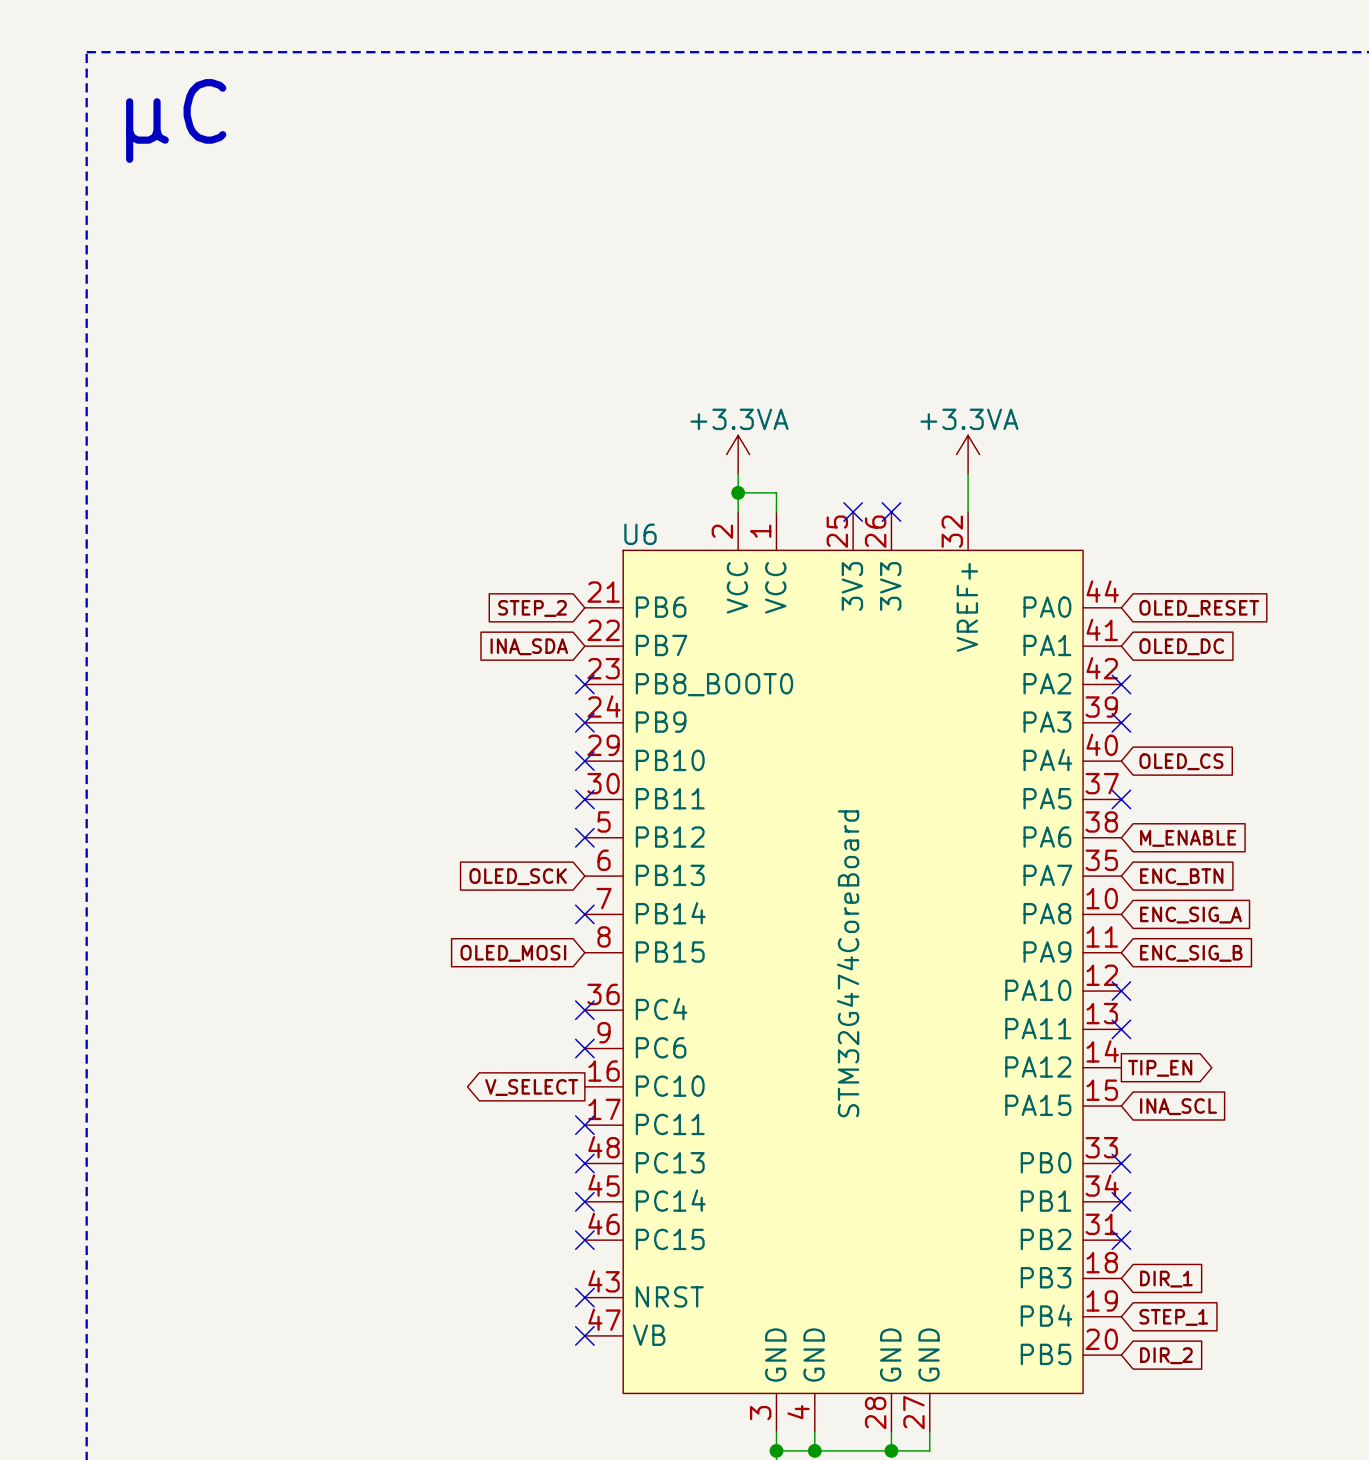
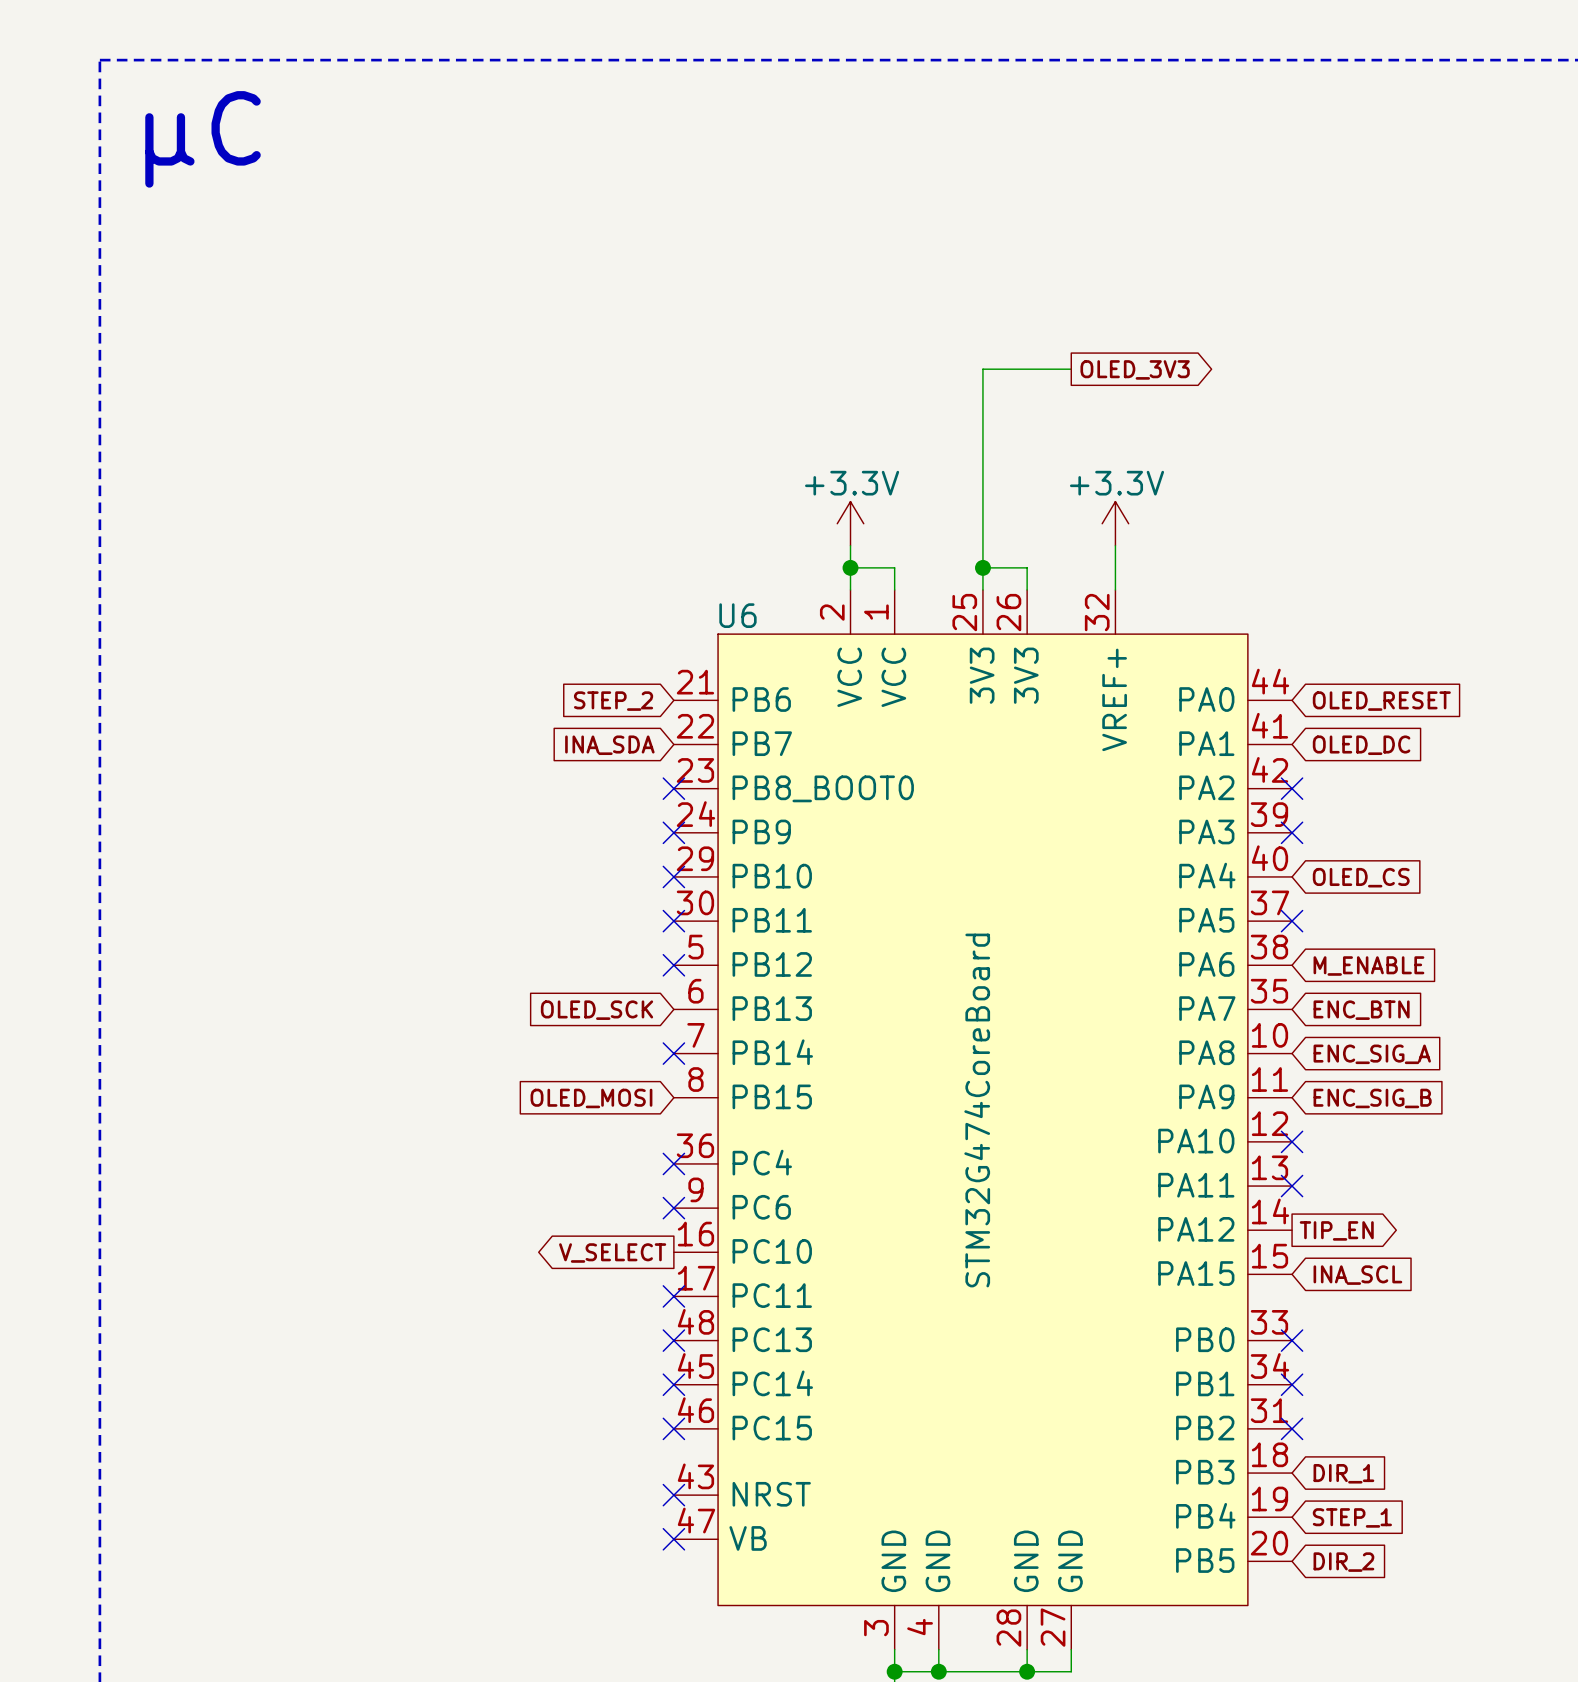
wire: none -> (1071, 369) (982, 369) (982, 589)
global label: none -> OLED_3V3 (1135, 369)
power symbol: +3.3VA (738, 454) -> +3.3V (850, 523)
power symbol: +3.3VA (968, 454) -> +3.3V (1115, 523)
wire: none -> (982, 567) (1027, 567) (1027, 589)
junction: none -> (982, 567)
no-connect mark: (853, 512) -> none
no-connect mark: (891, 512) -> none

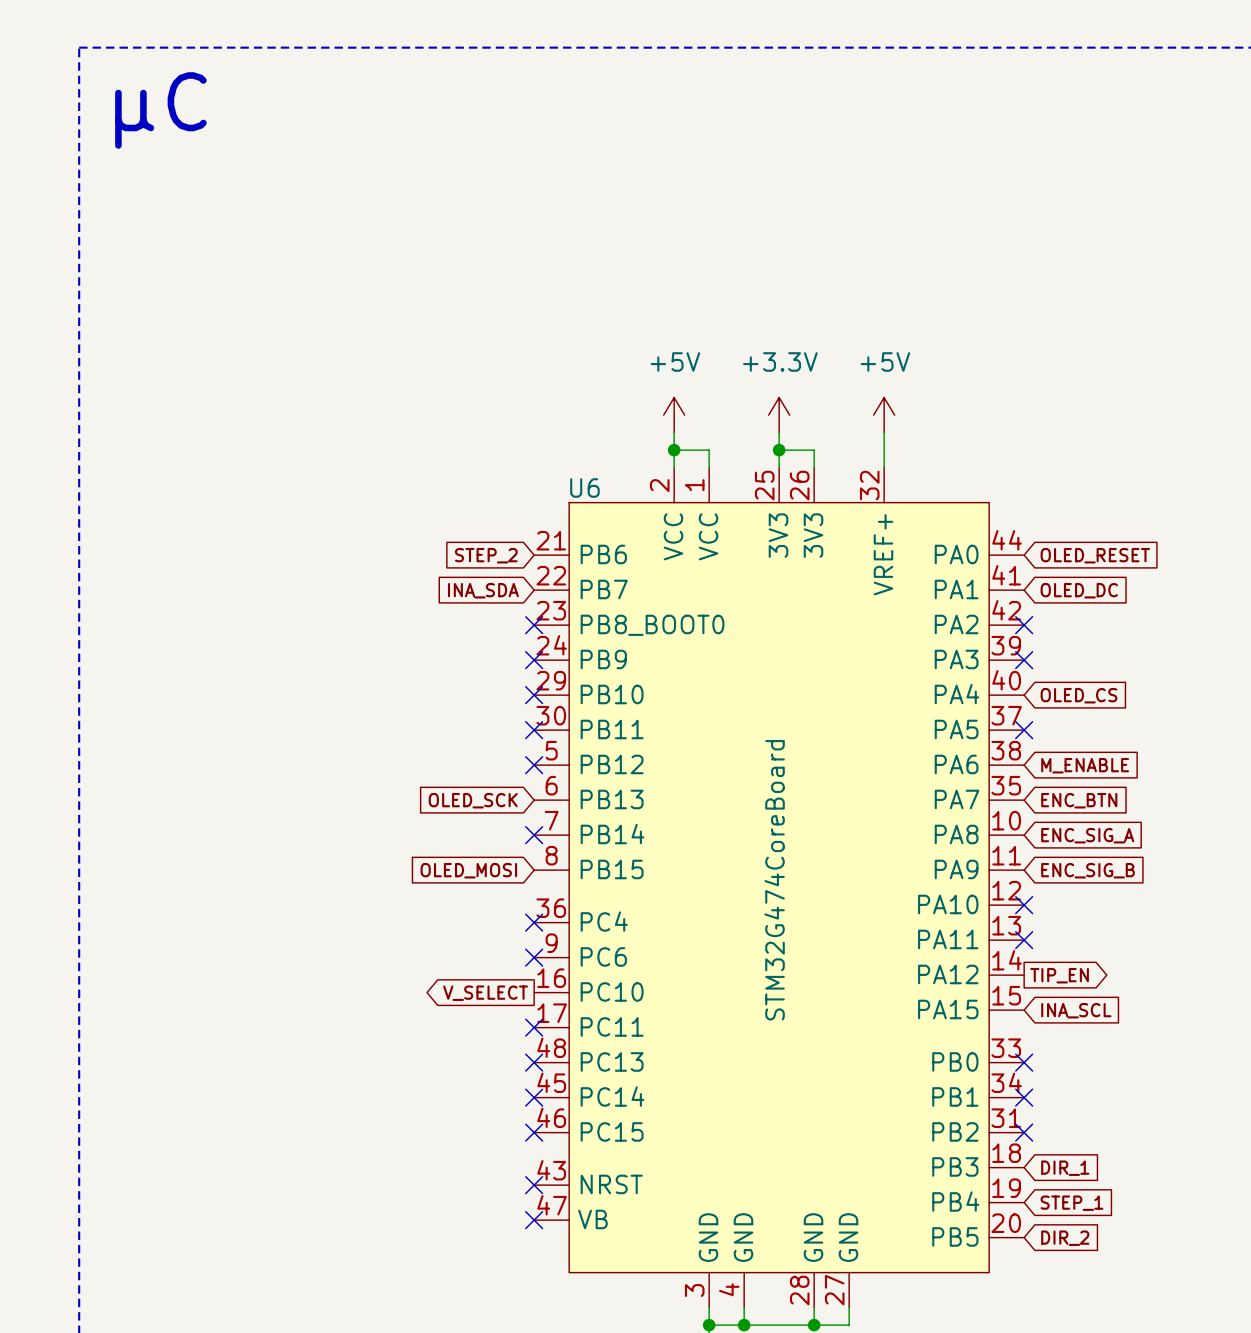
wire: (1071, 369) (982, 369) (982, 545) -> none
global label: OLED_3V3 (1135, 369) -> none
power symbol: +3.3V (850, 523) -> +5V (674, 415)
power symbol: none -> +3.3V (779, 415)
power symbol: +3.3V (1115, 523) -> +5V (884, 415)

